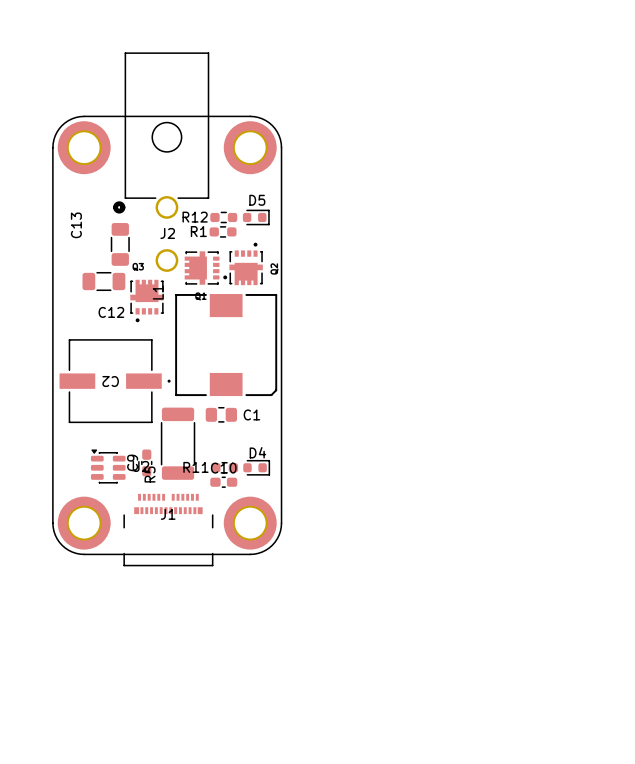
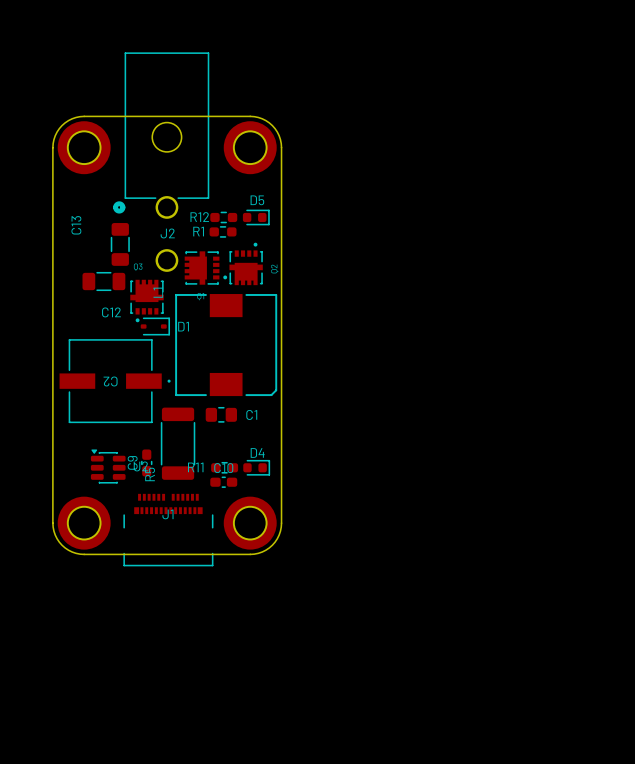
D1: none -> (155, 326)

